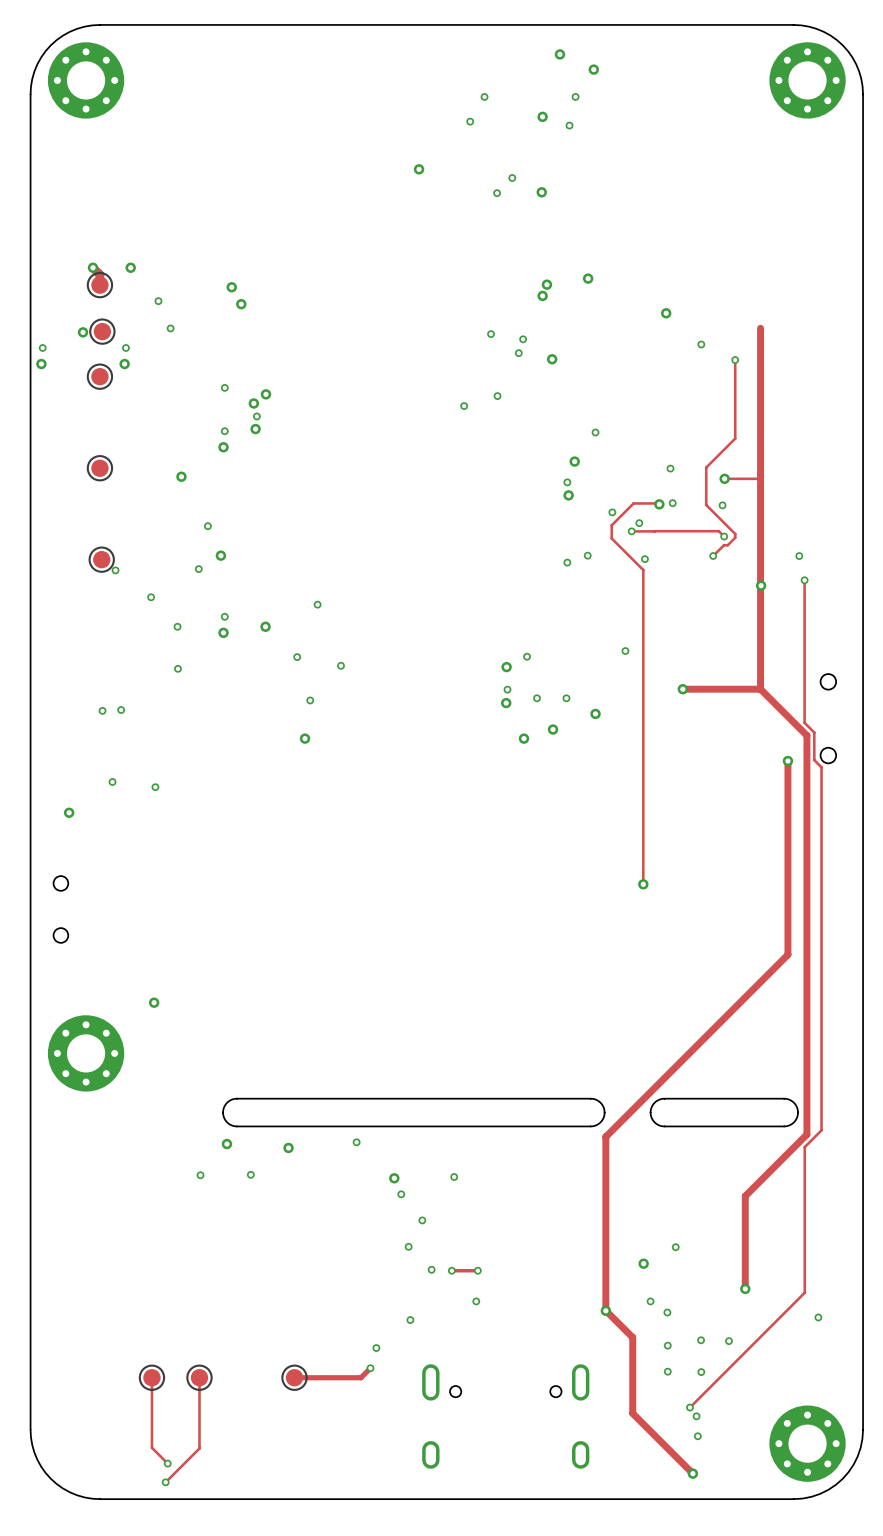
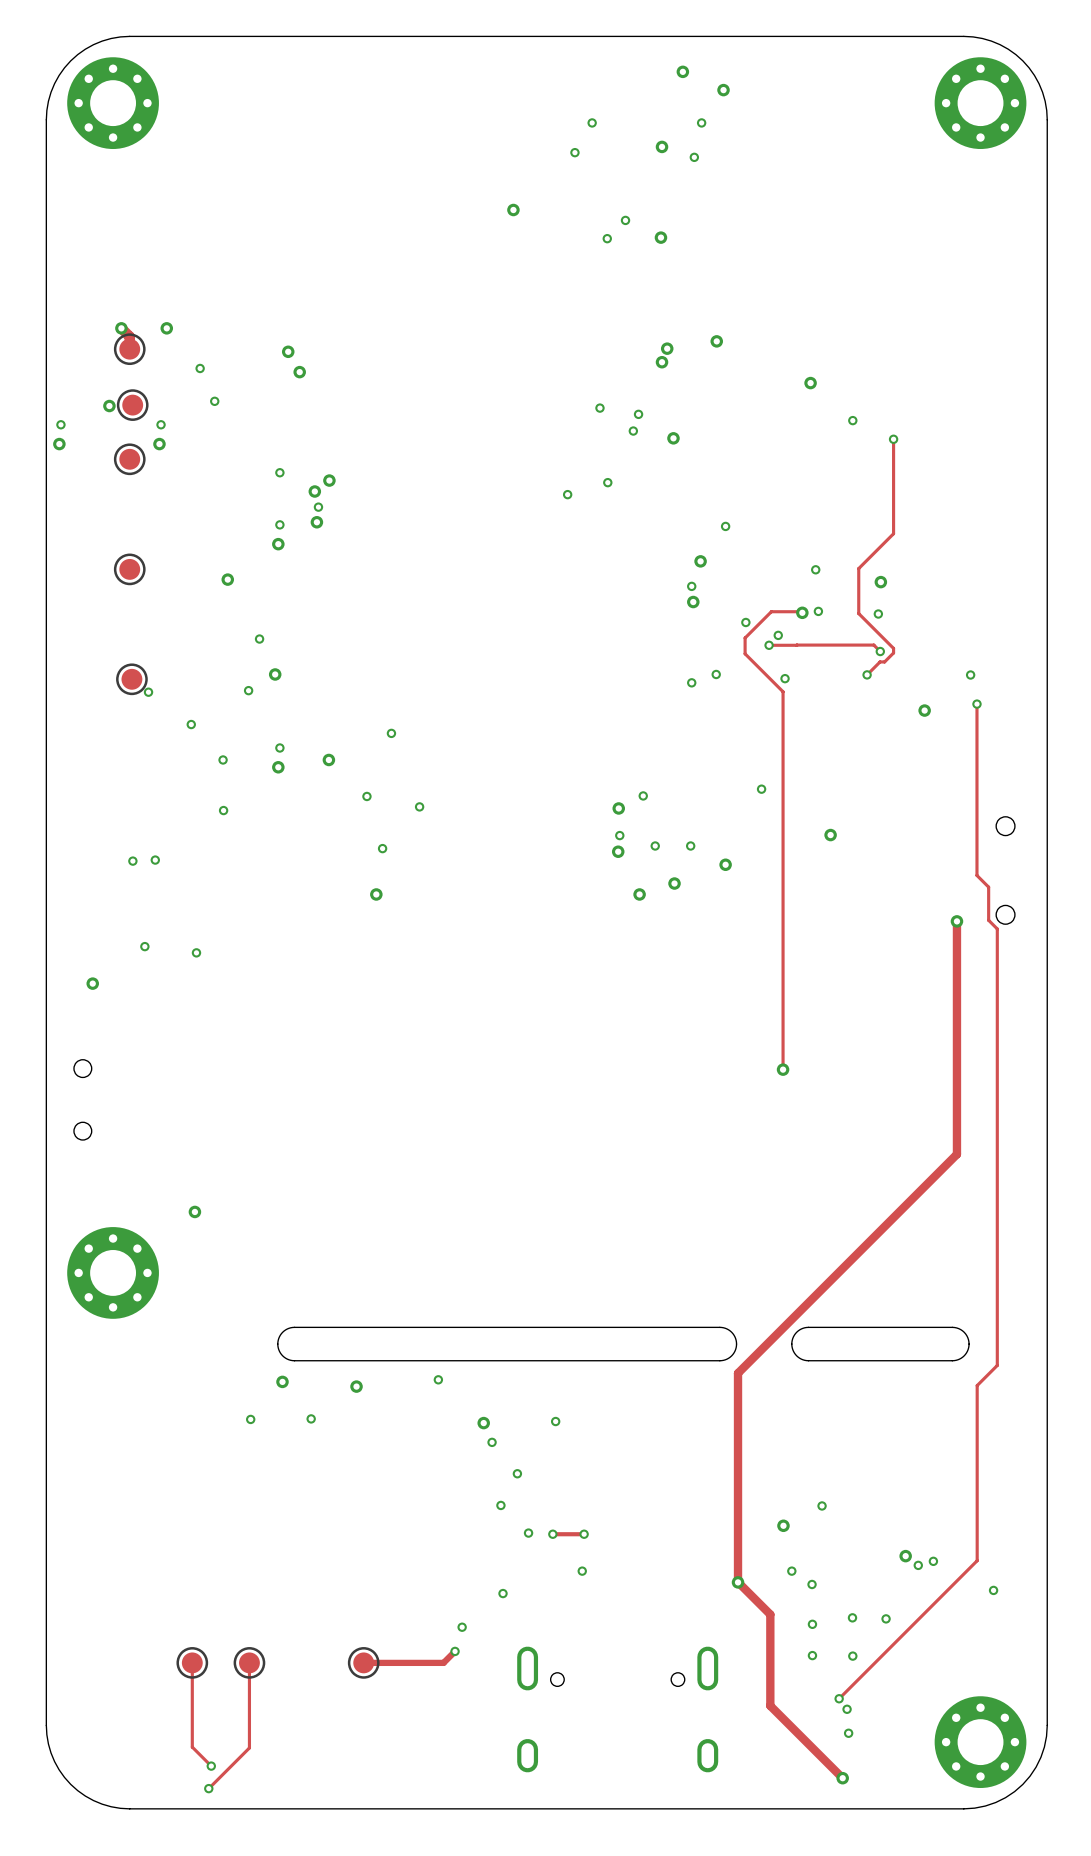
track: (760, 328) (760, 689) -> none
track: (760, 476) (757, 478) (724, 478) -> none
track: (682, 689) (760, 689) -> none
track: (760, 689) (806, 735) (806, 1134) (745, 1196) (745, 1288) -> none
via: none -> (933, 1561)
via: none -> (918, 1565)

